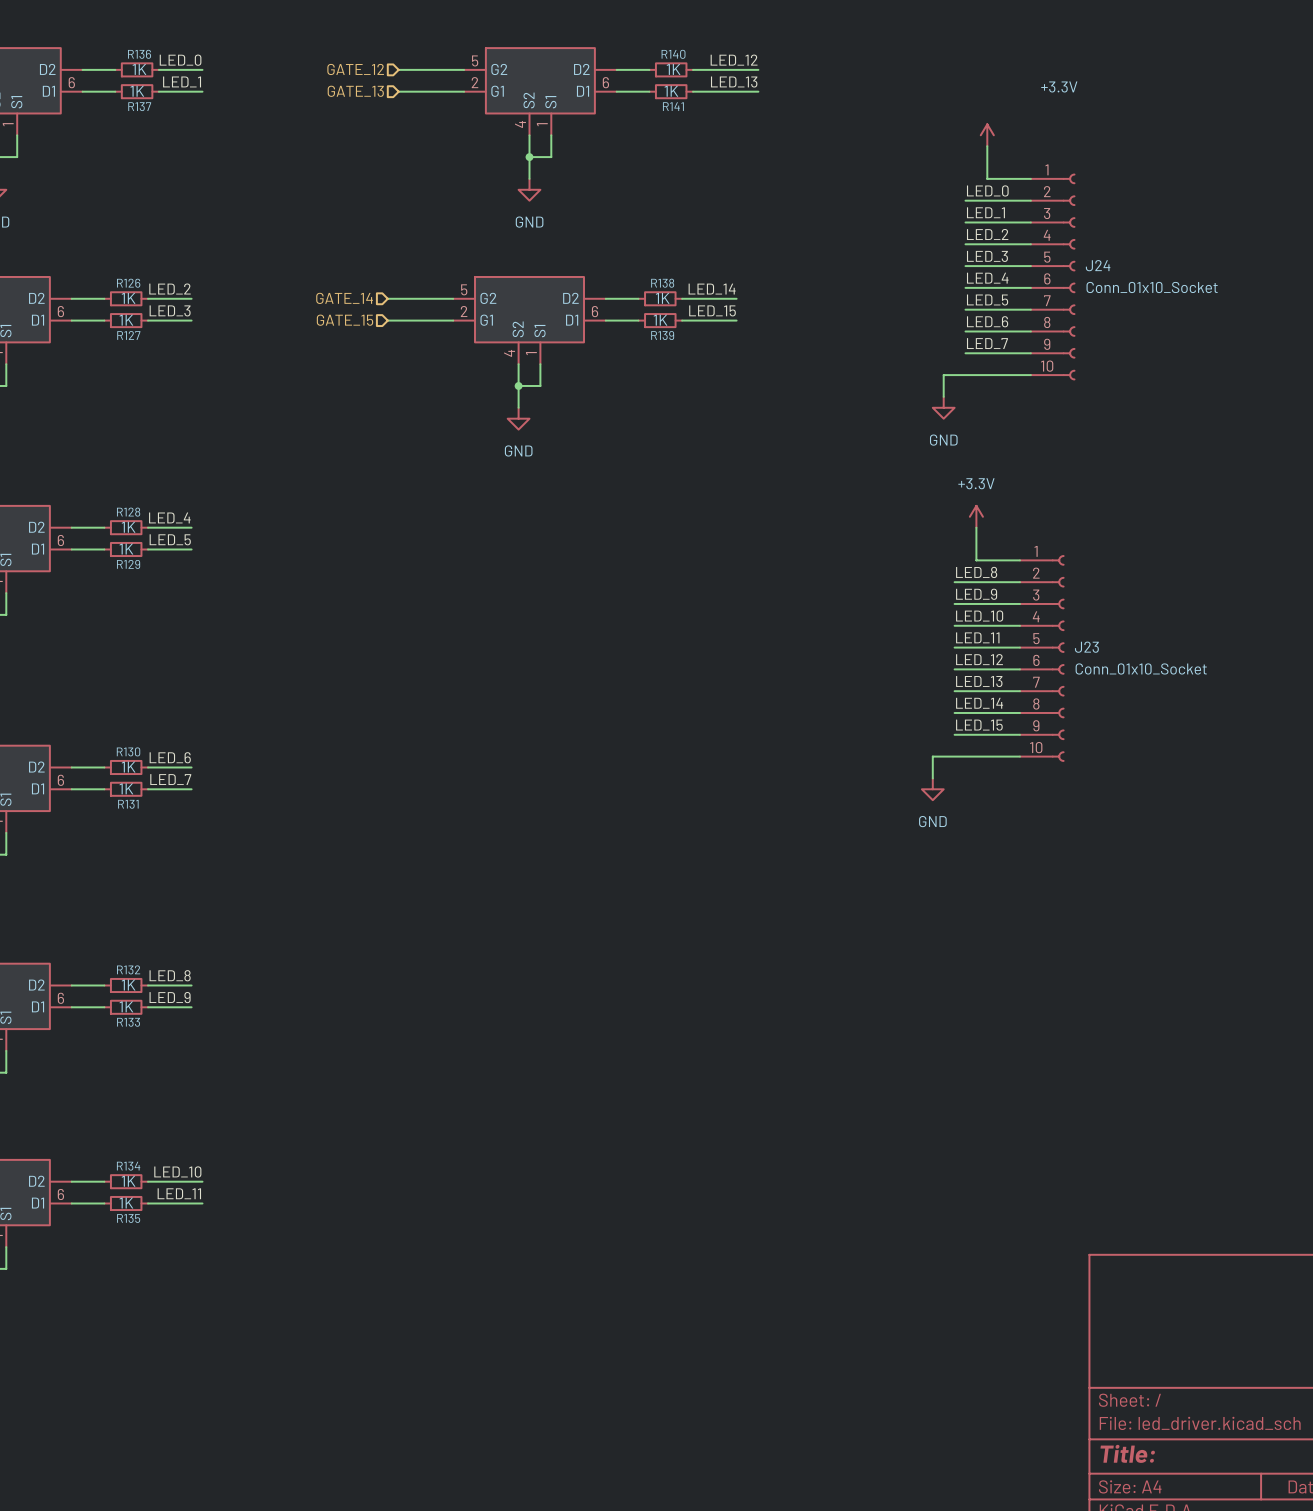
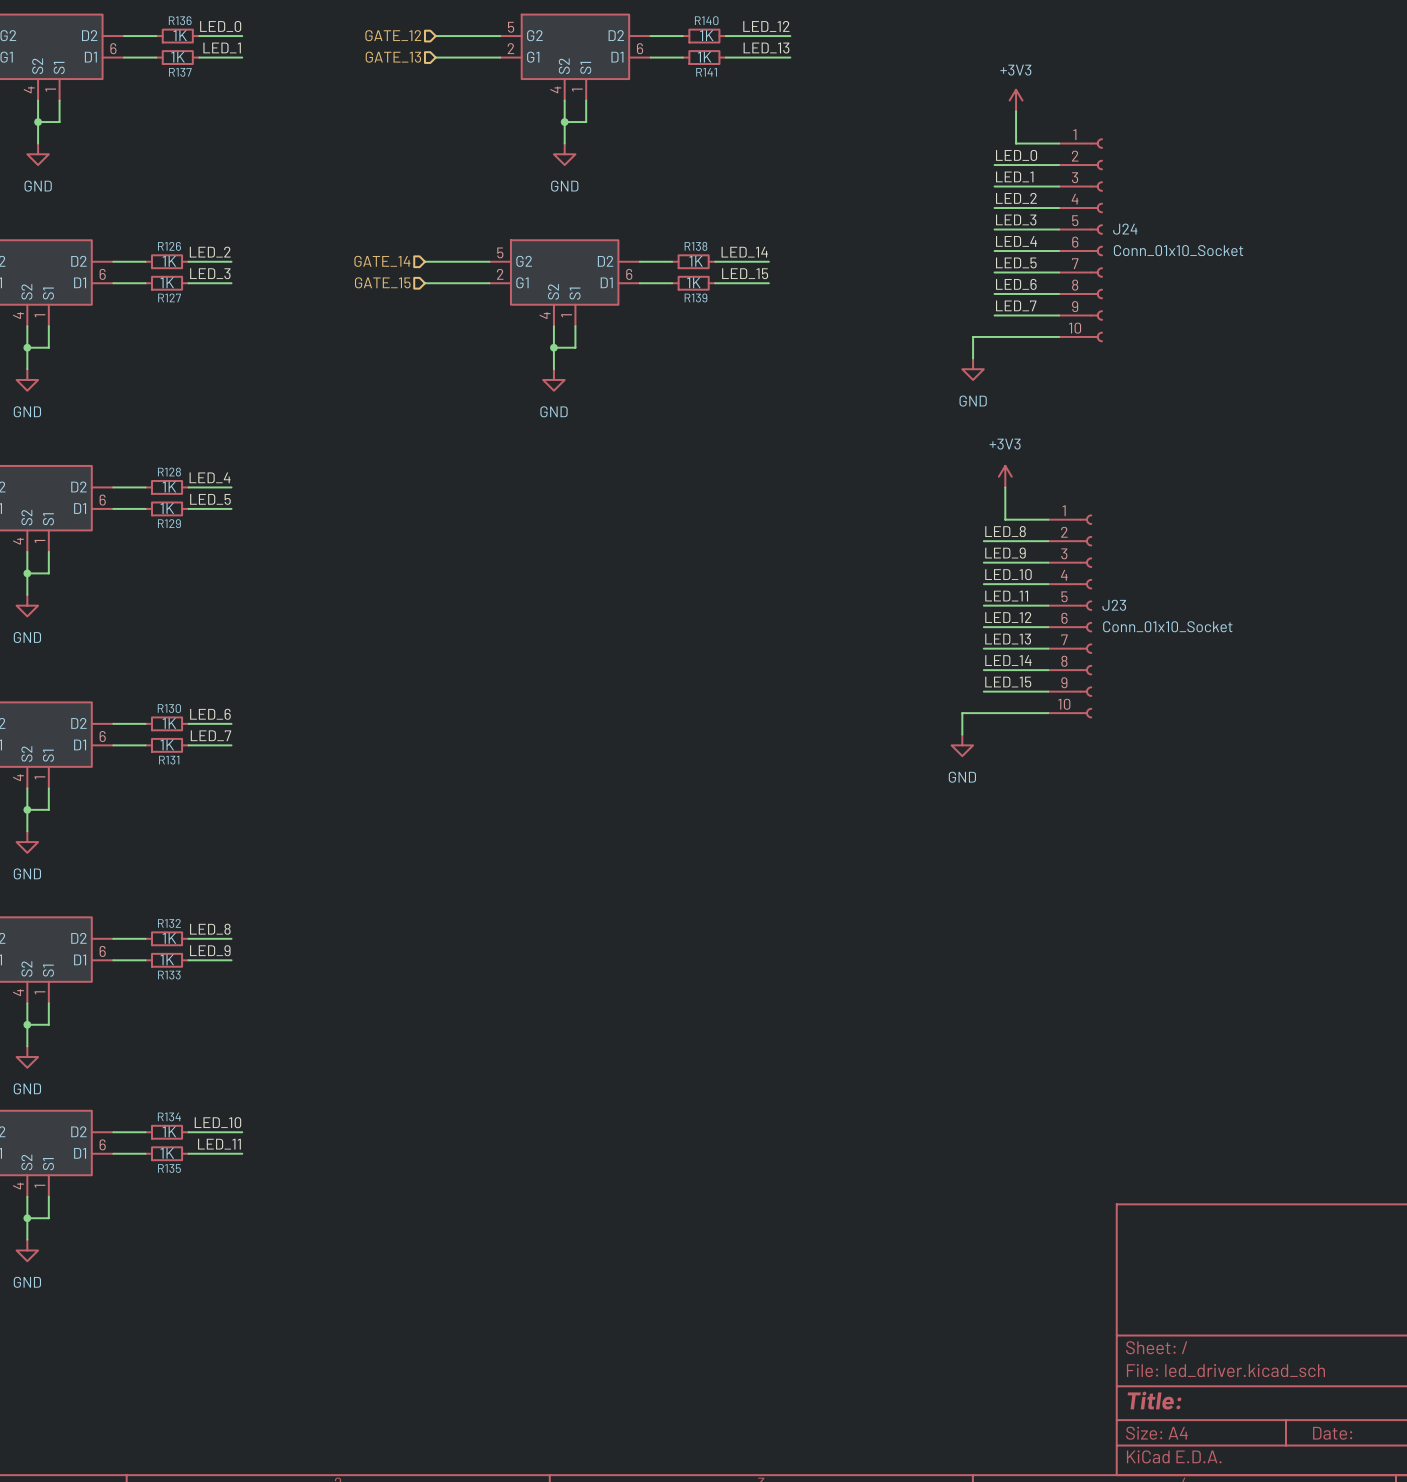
power symbol: +3.3V (987, 135) -> +3V3 (1016, 100)
power symbol: +3.3V (976, 516) -> +3V3 (1005, 476)

